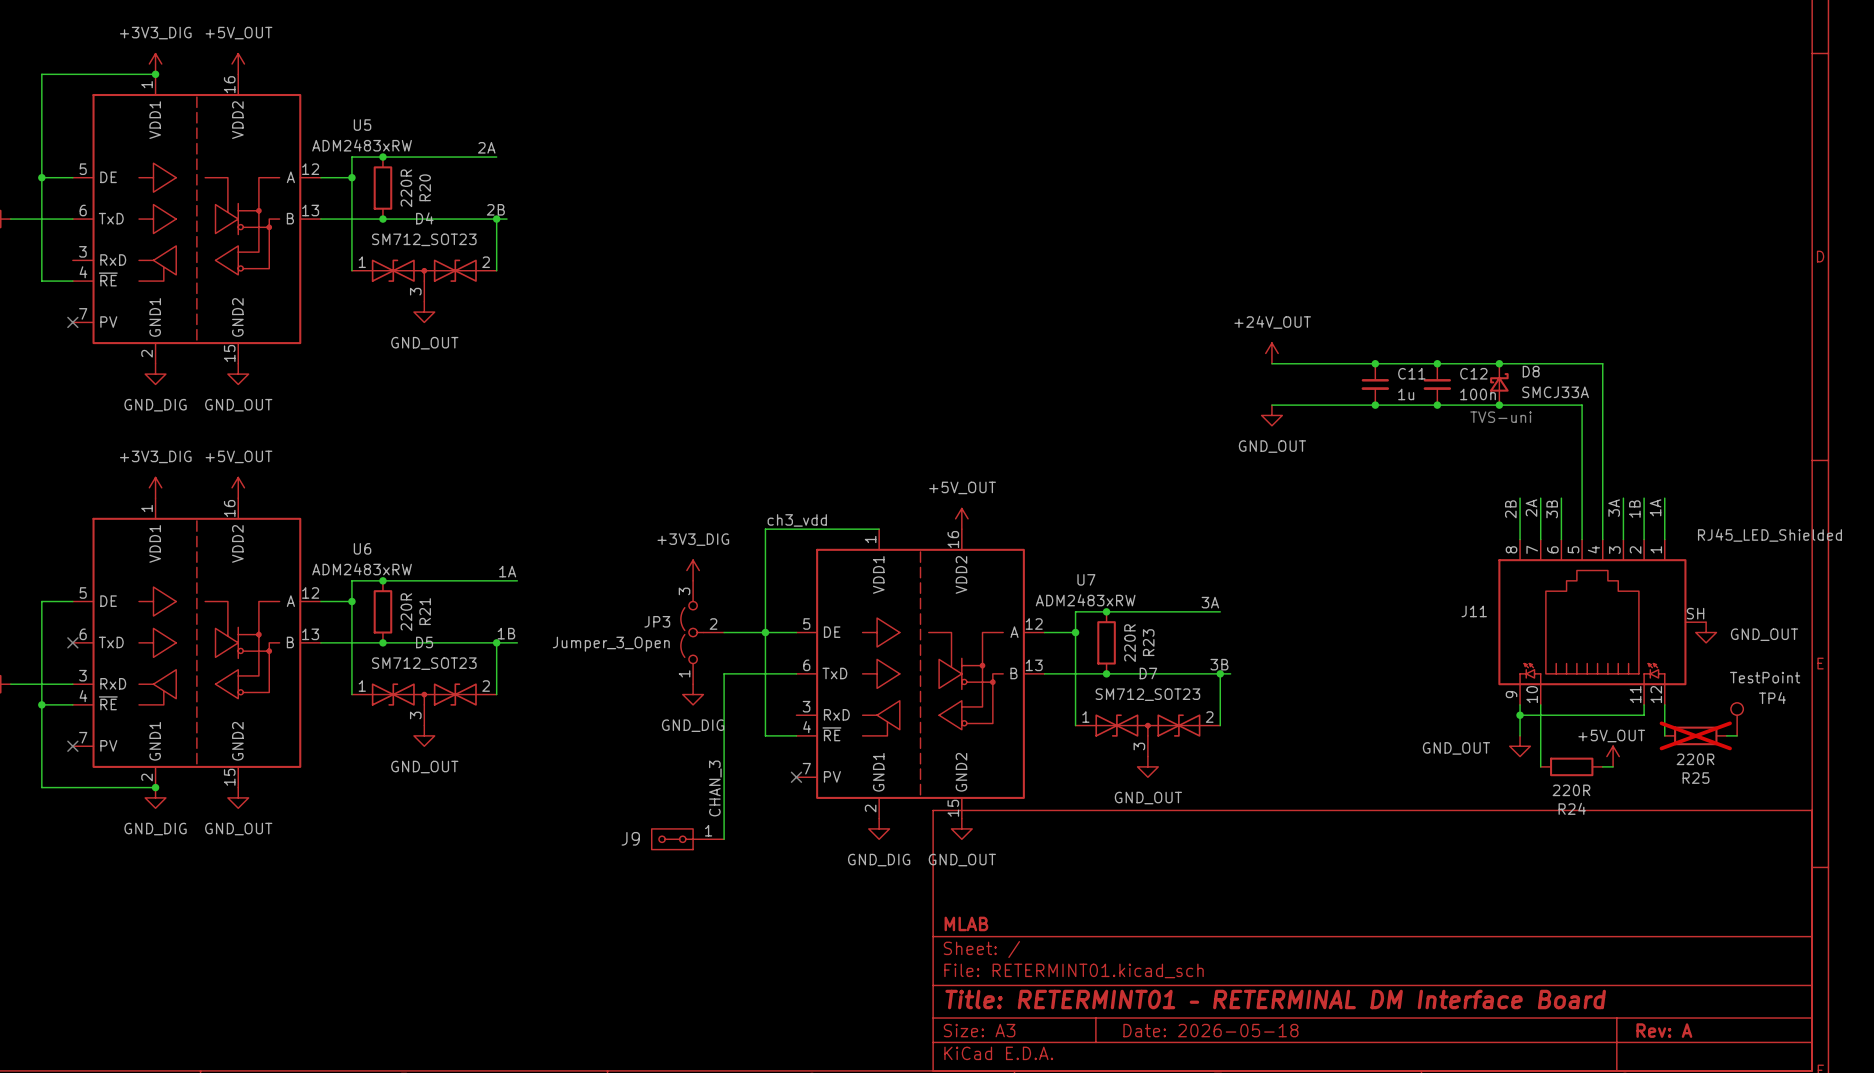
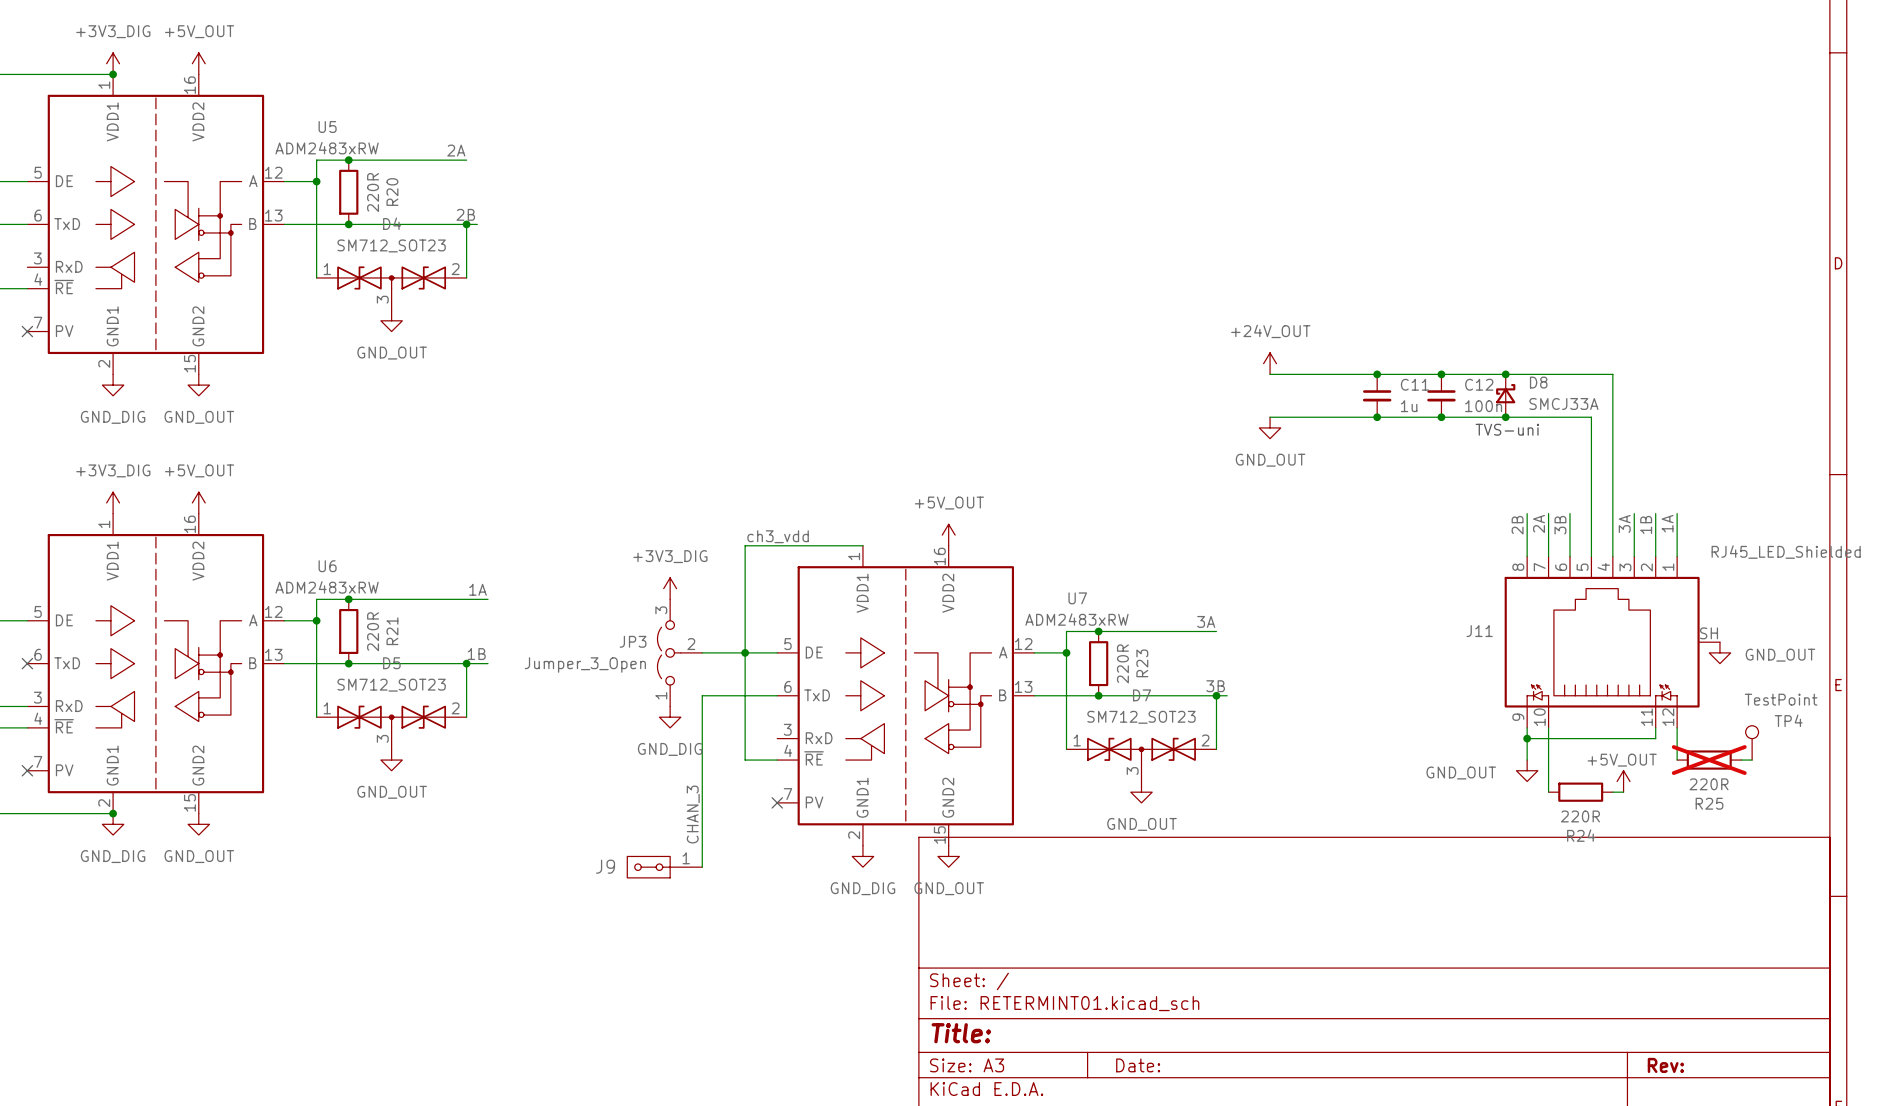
title block: MLAB (966, 923) -> none
title block: Title: RETERMINT01 – RETERMINAL DM Interface Board (1275, 999) -> Title: (961, 1033)
title block: Date: 2026-05-18 (1210, 1030) -> Date: (1138, 1065)
title block: Rev: A (1664, 1030) -> Rev: (1665, 1065)

